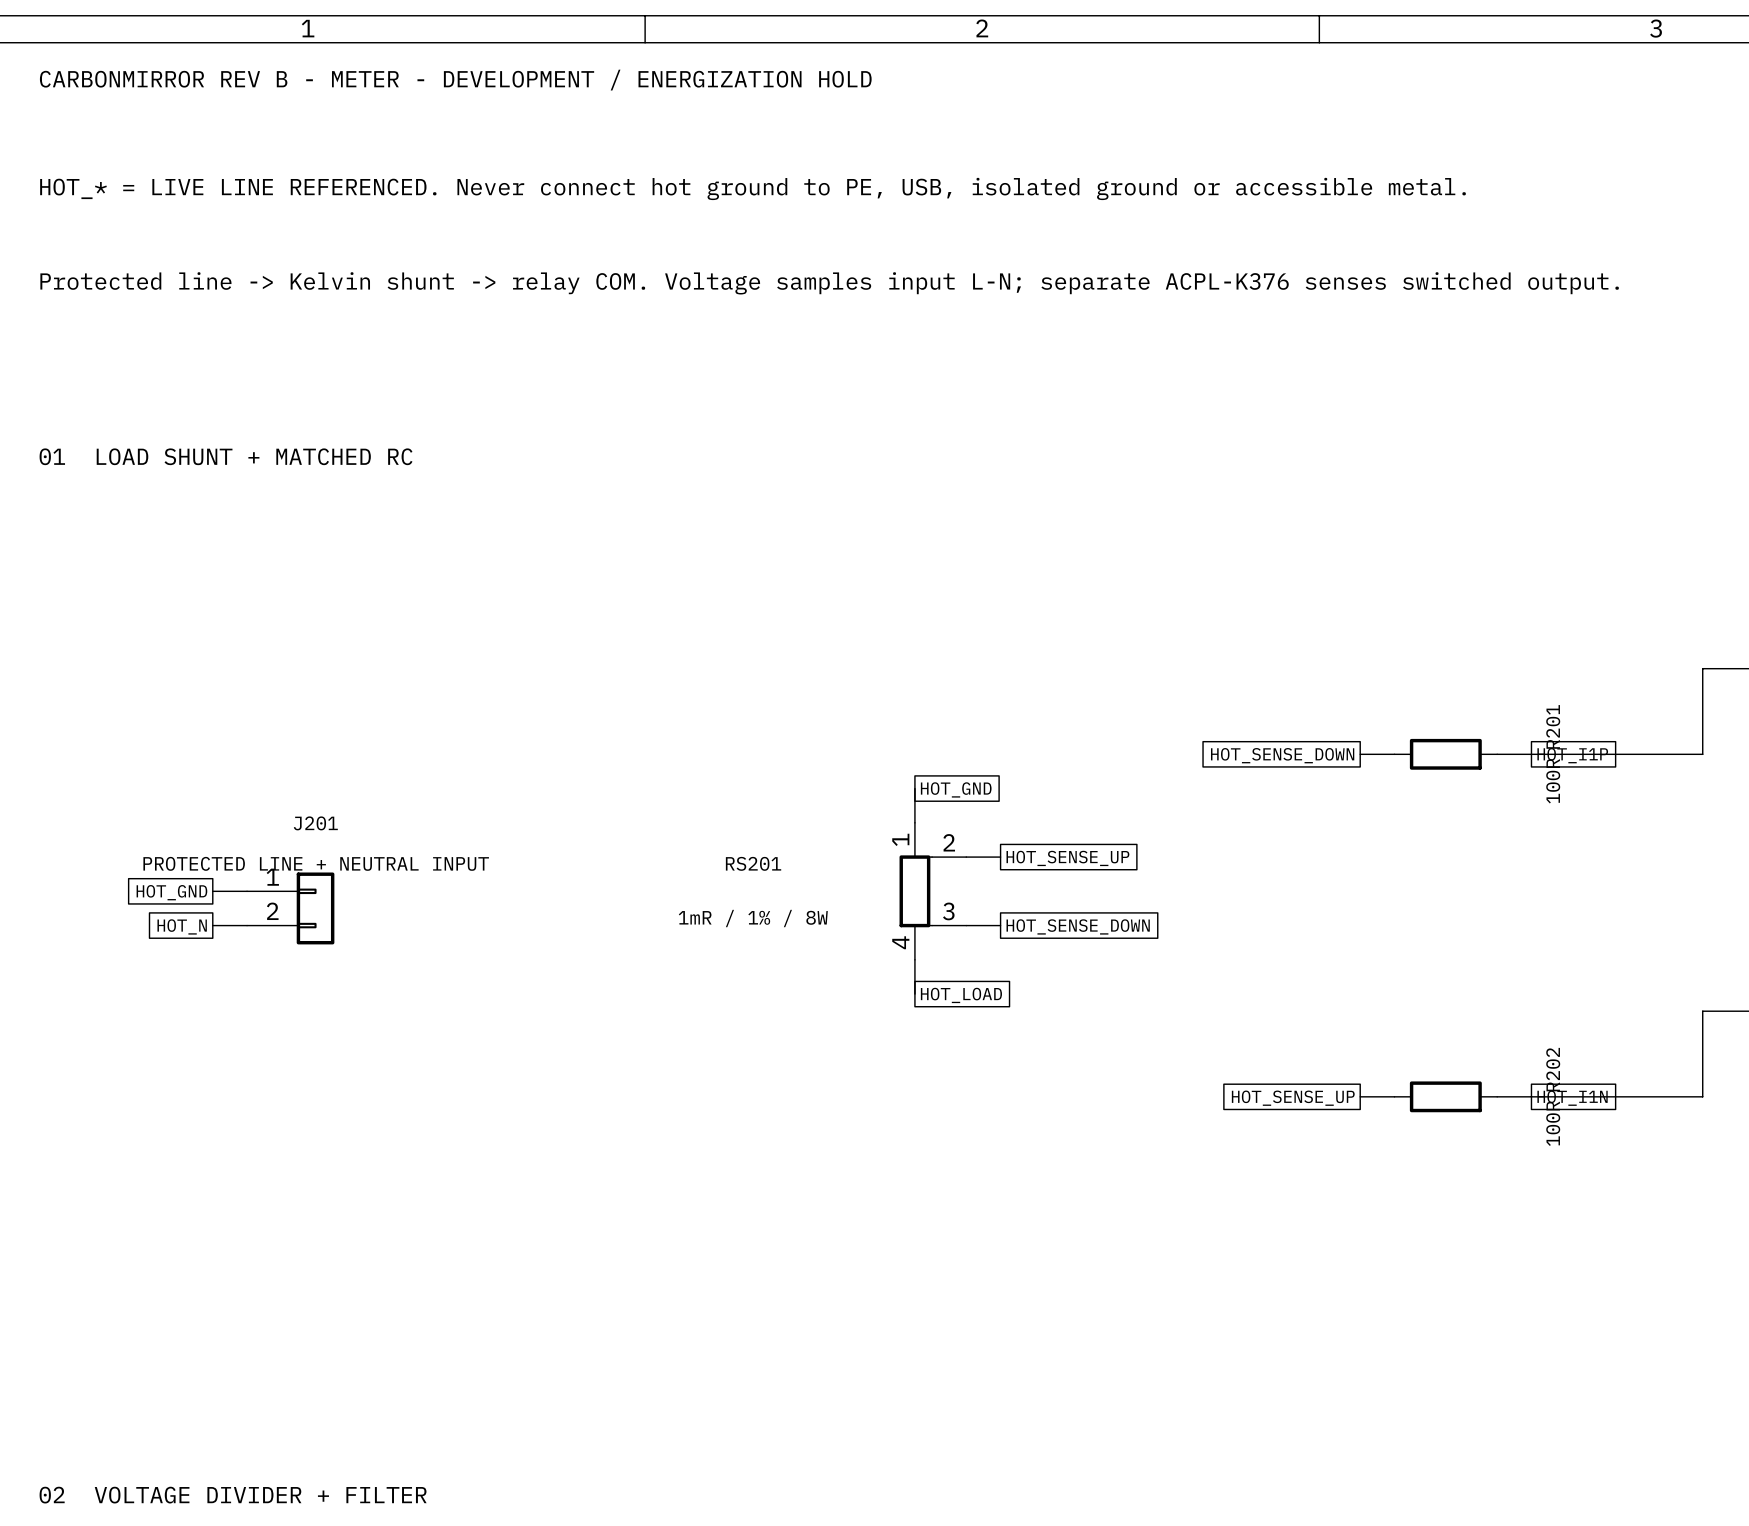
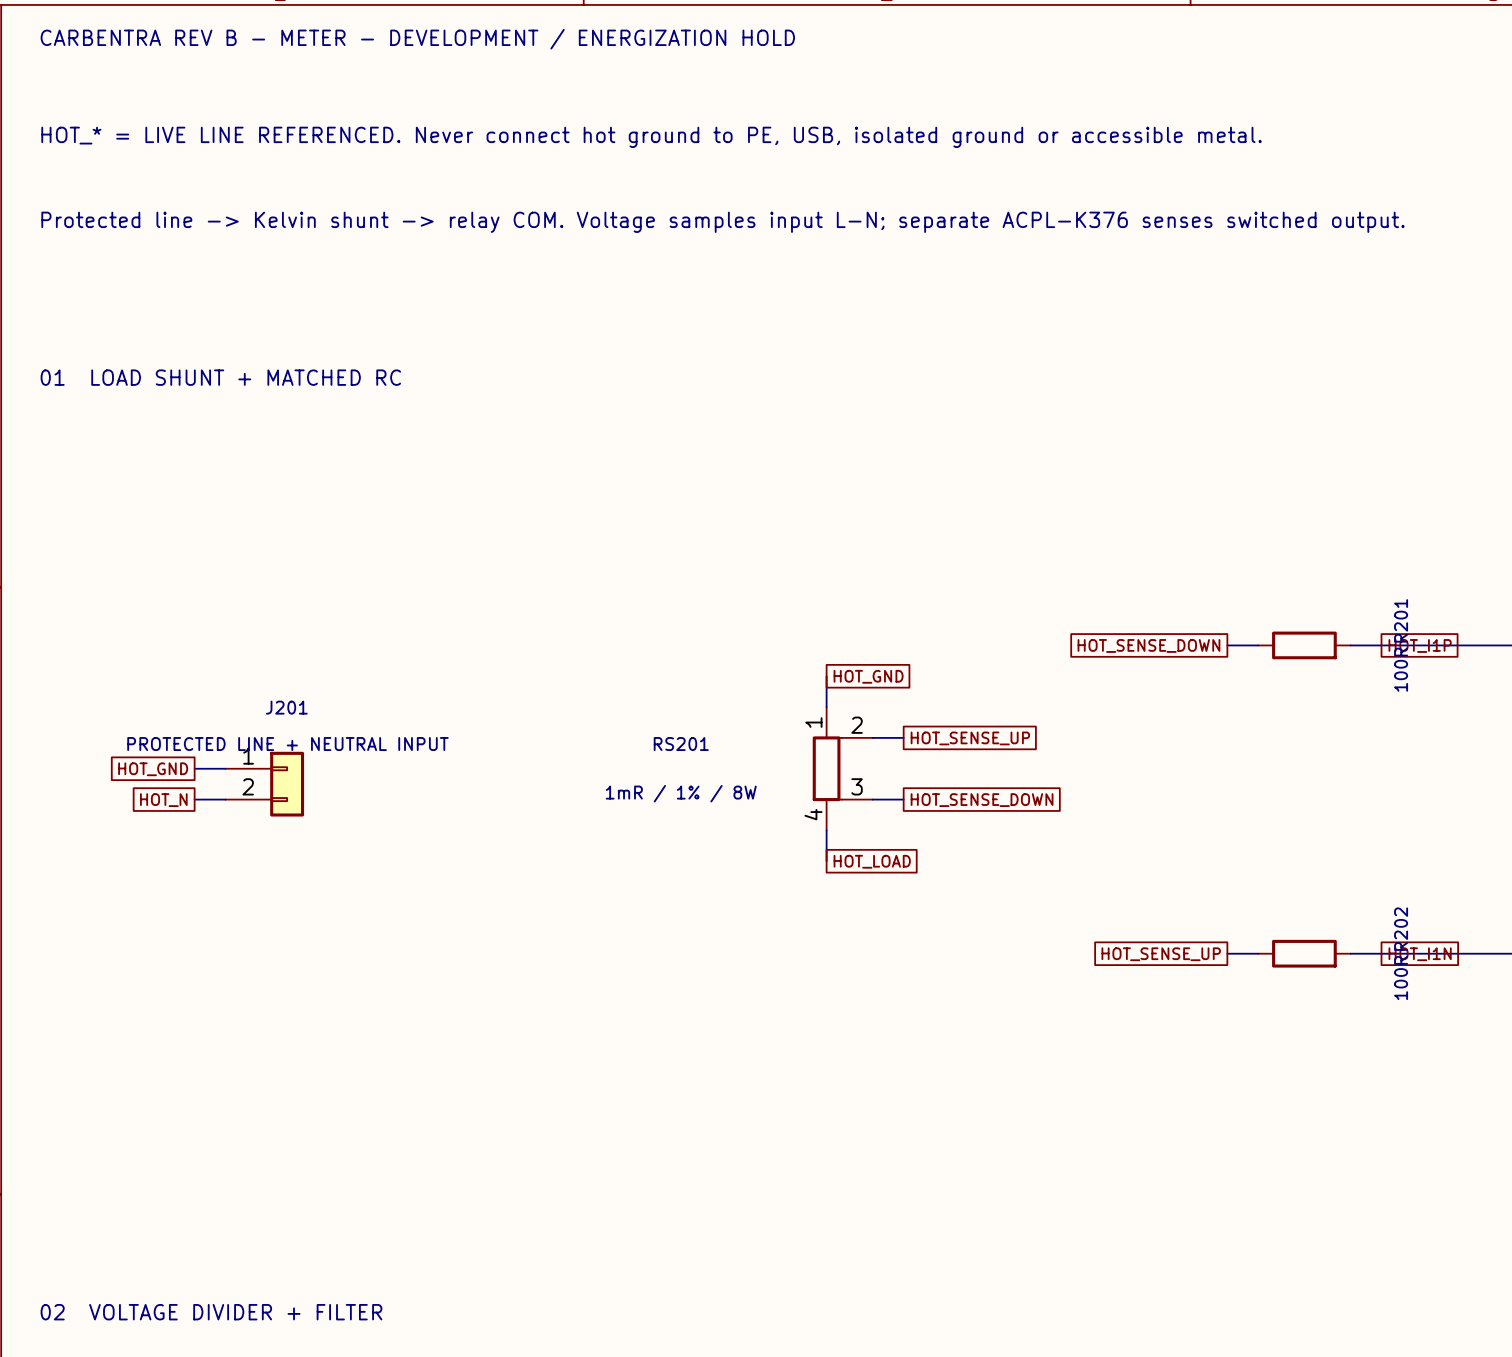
text: CARBONMIRROR REV B - METER - DEVELOPMENT / ENERGIZATION HOLD (455, 80) -> CARBENTRA REV B - METER - DEVELOPMENT / ENERGIZATION HOLD (417, 39)

